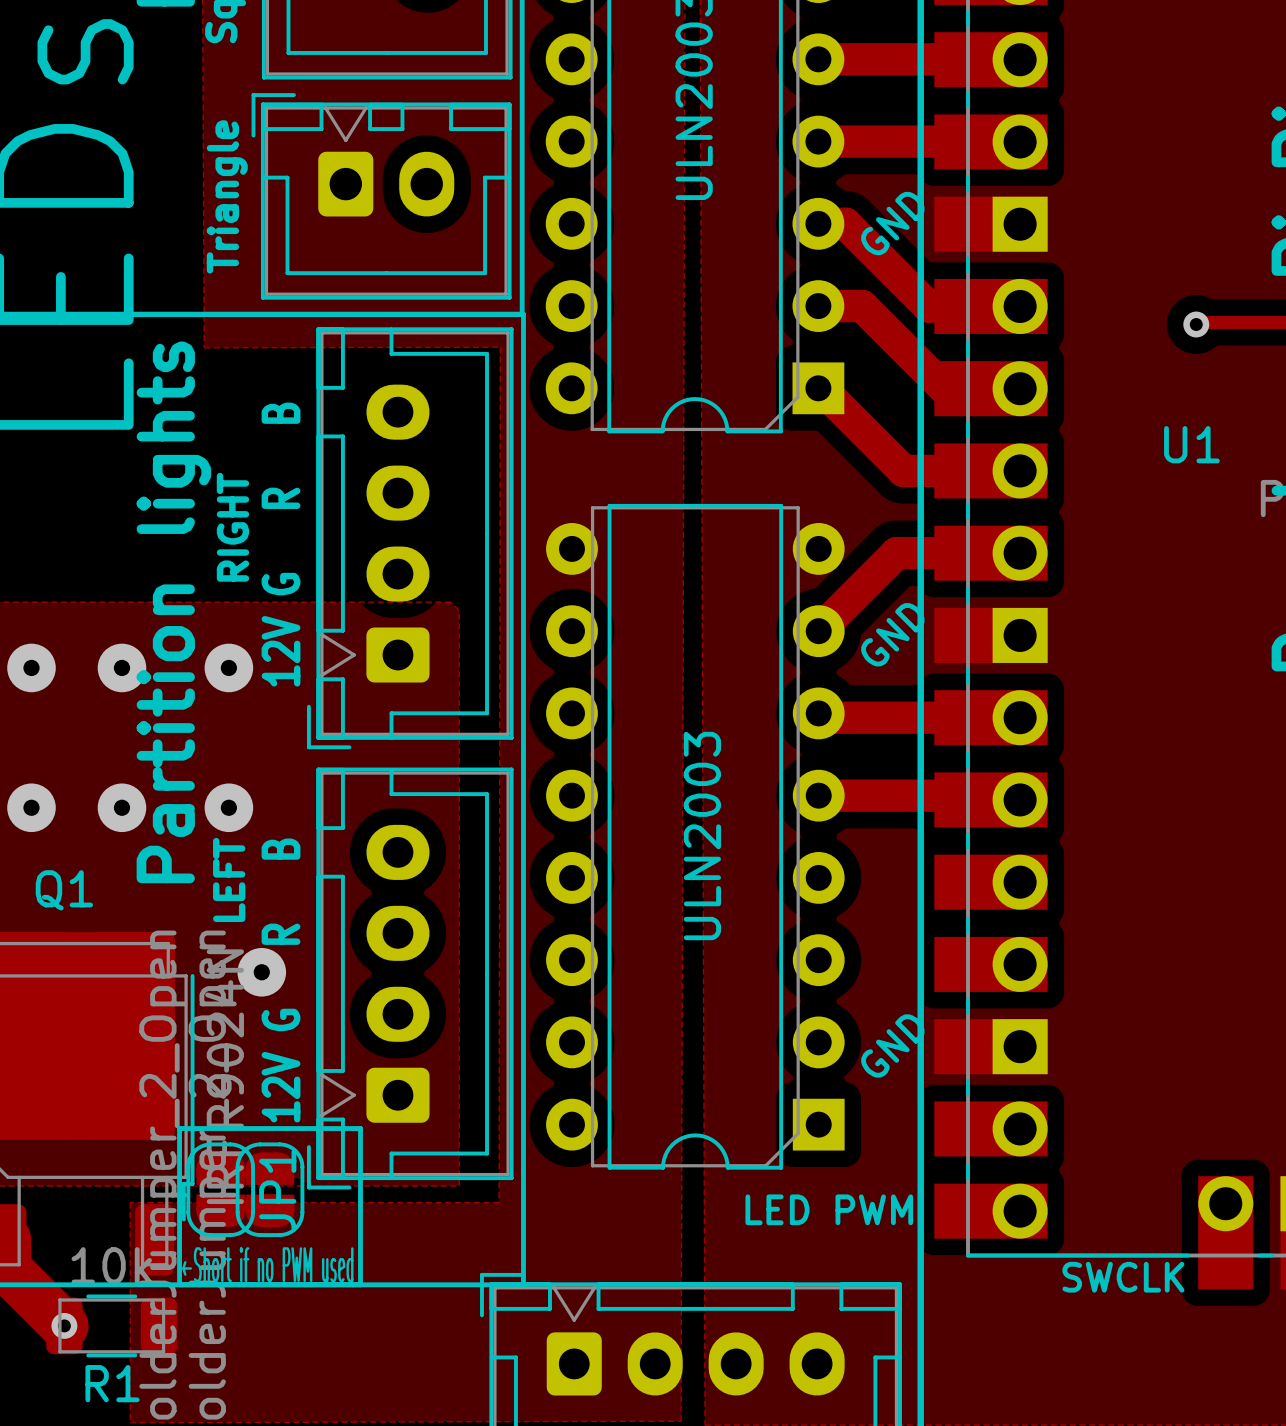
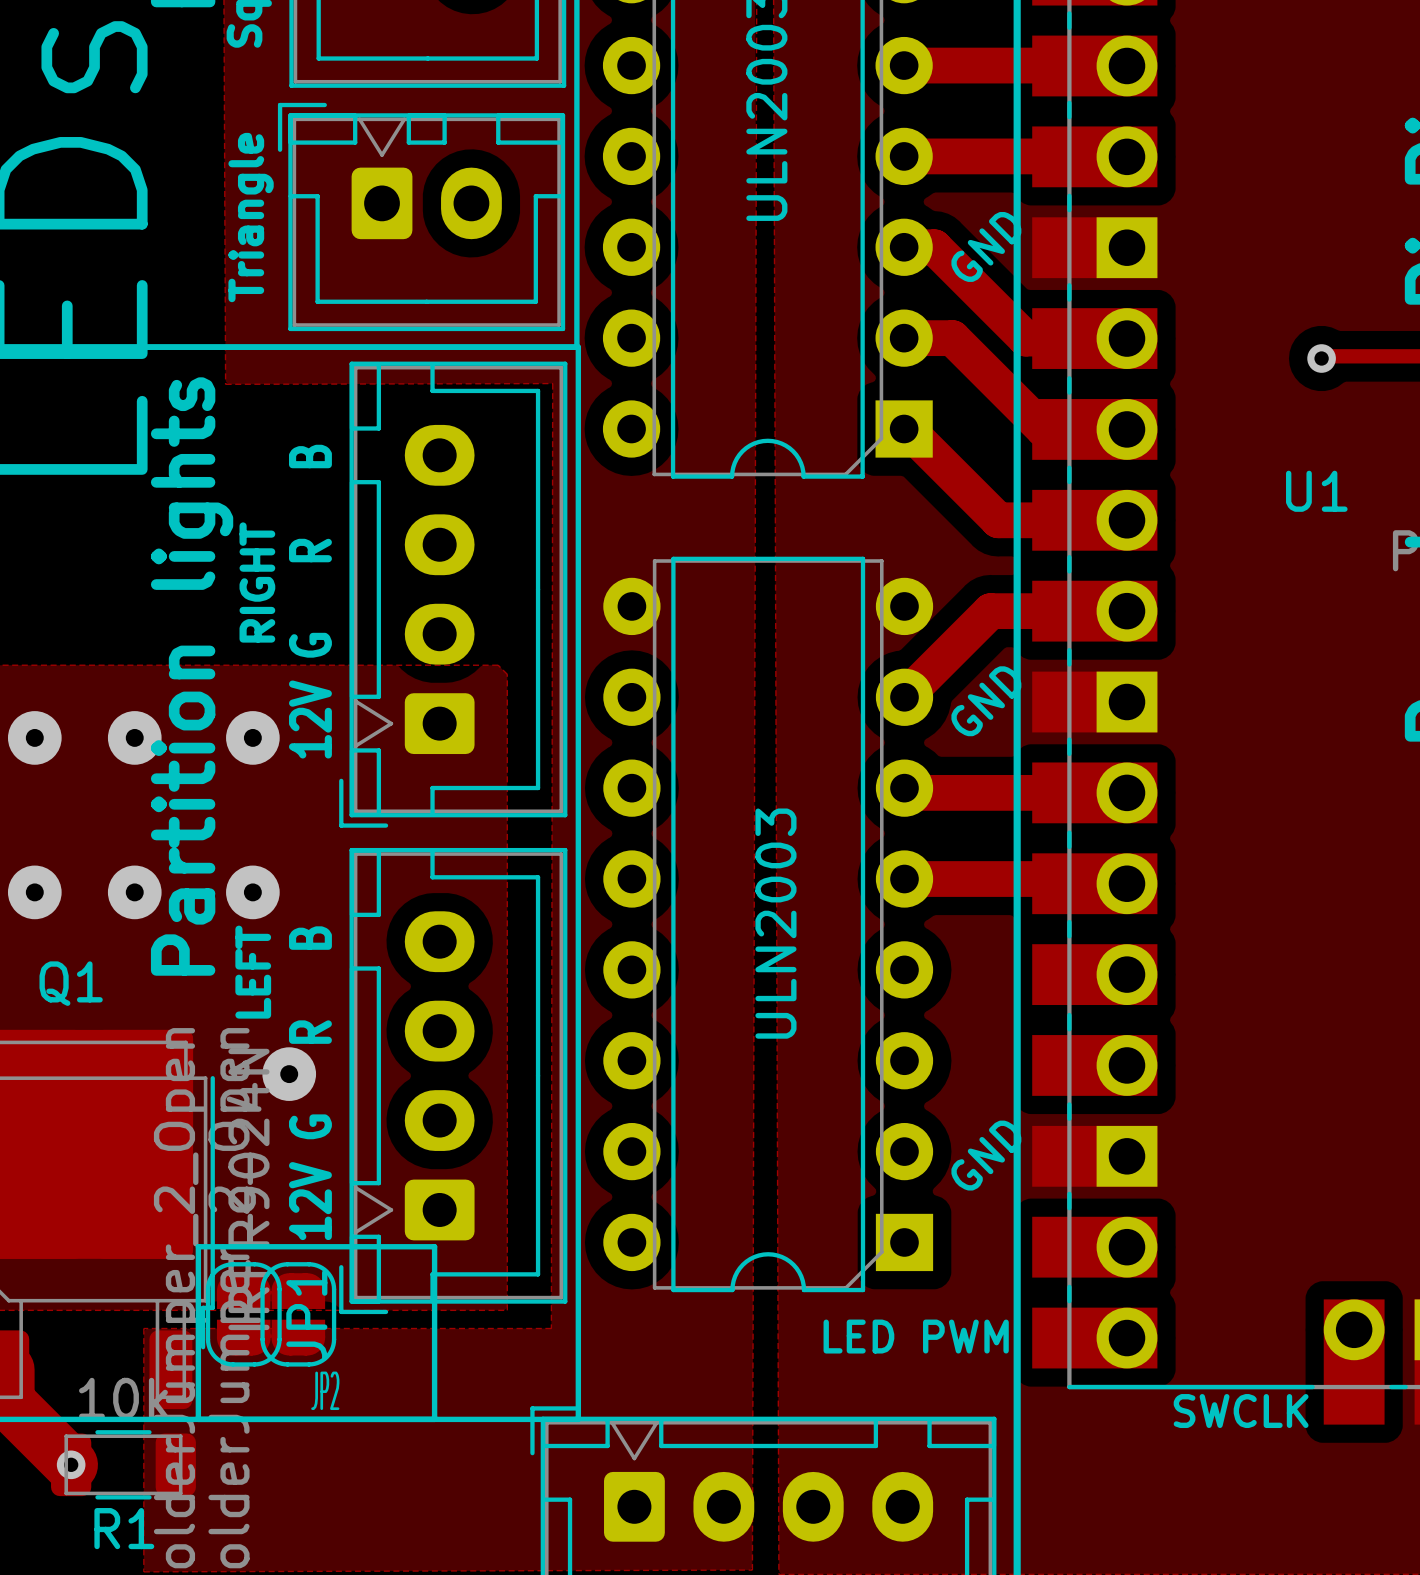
line: (360, 1128) (360, 1284) -> (398, 1246) (434, 1246) (434, 1419)
JP2 name: none -> JP2 (325, 1390)
text: ←Short if no PWM used (267, 1264) -> none

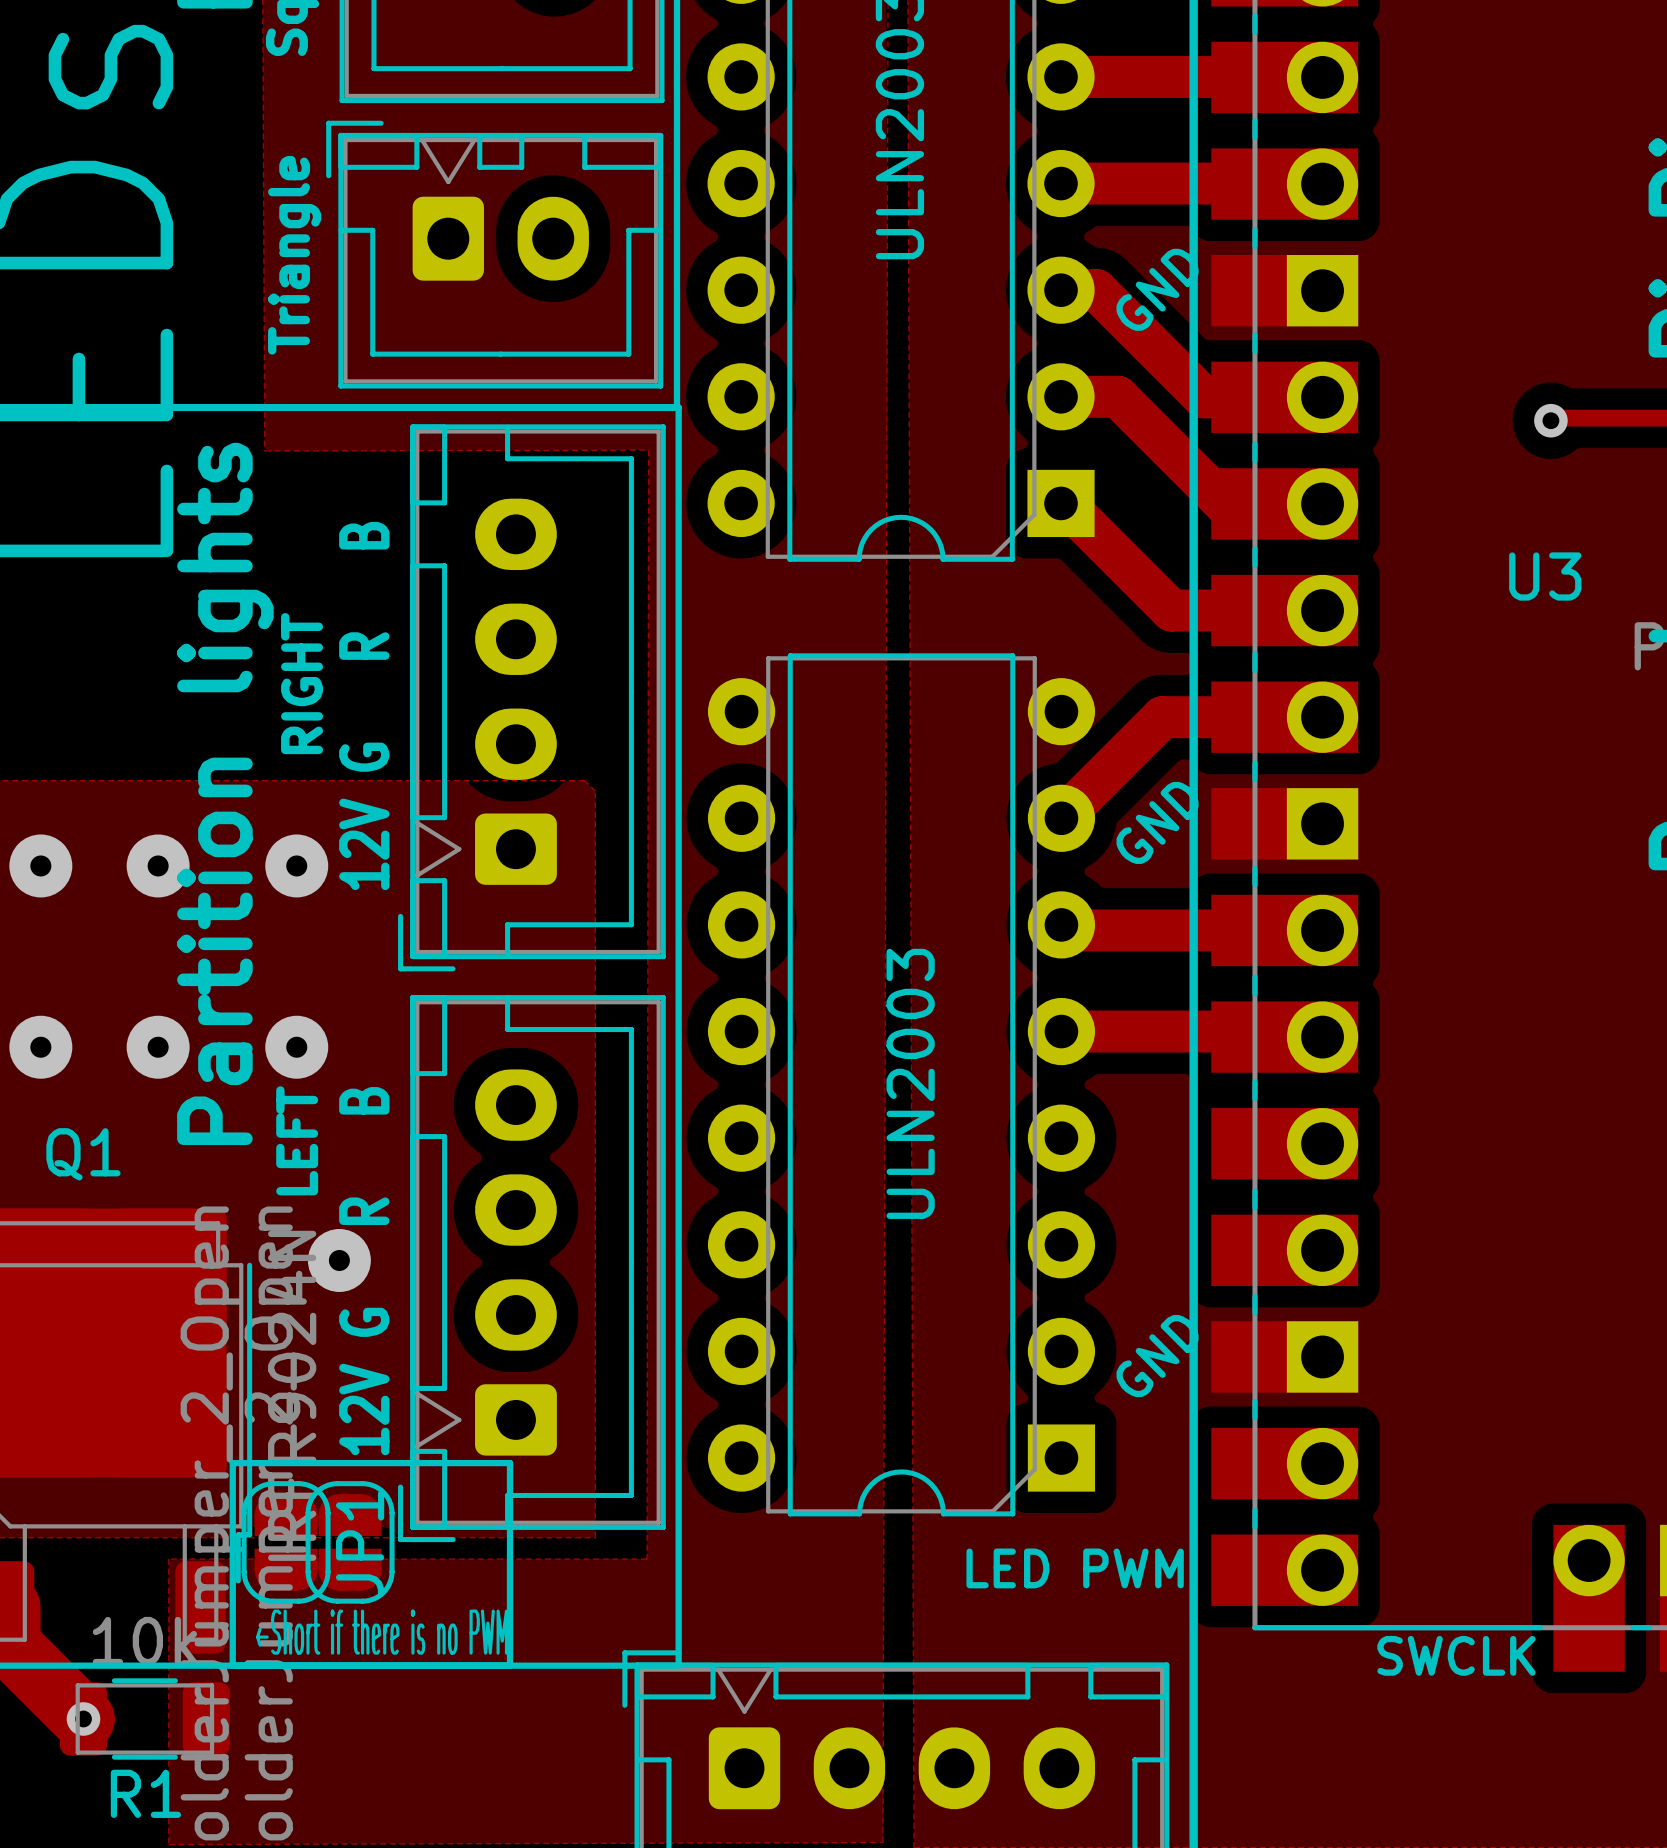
U1 name: U1 (1316, 491) -> U3 (1545, 576)
JP2 name: JP2 (325, 1390) -> ←Short if there is no PWM (382, 1632)

